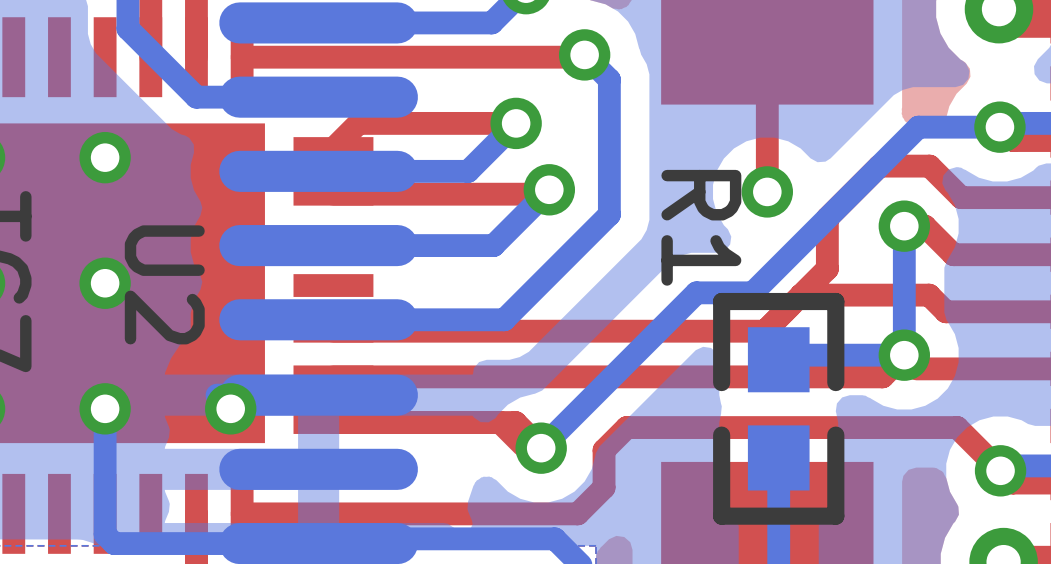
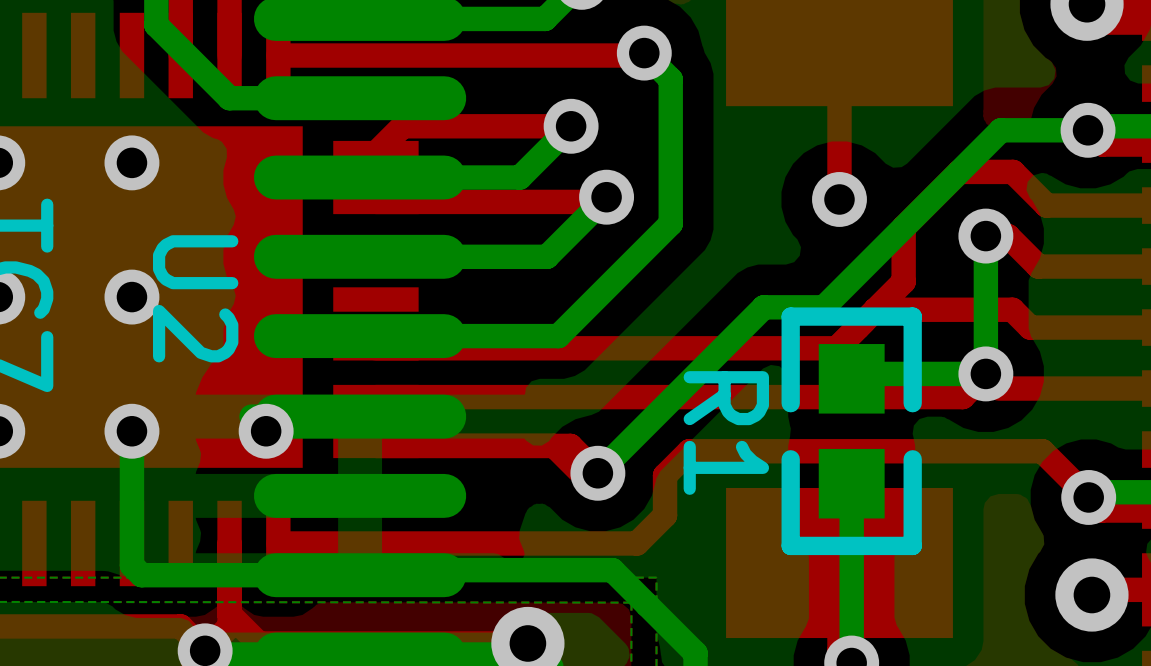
R1 name position: R1 (701, 227) -> R1 (726, 433)

